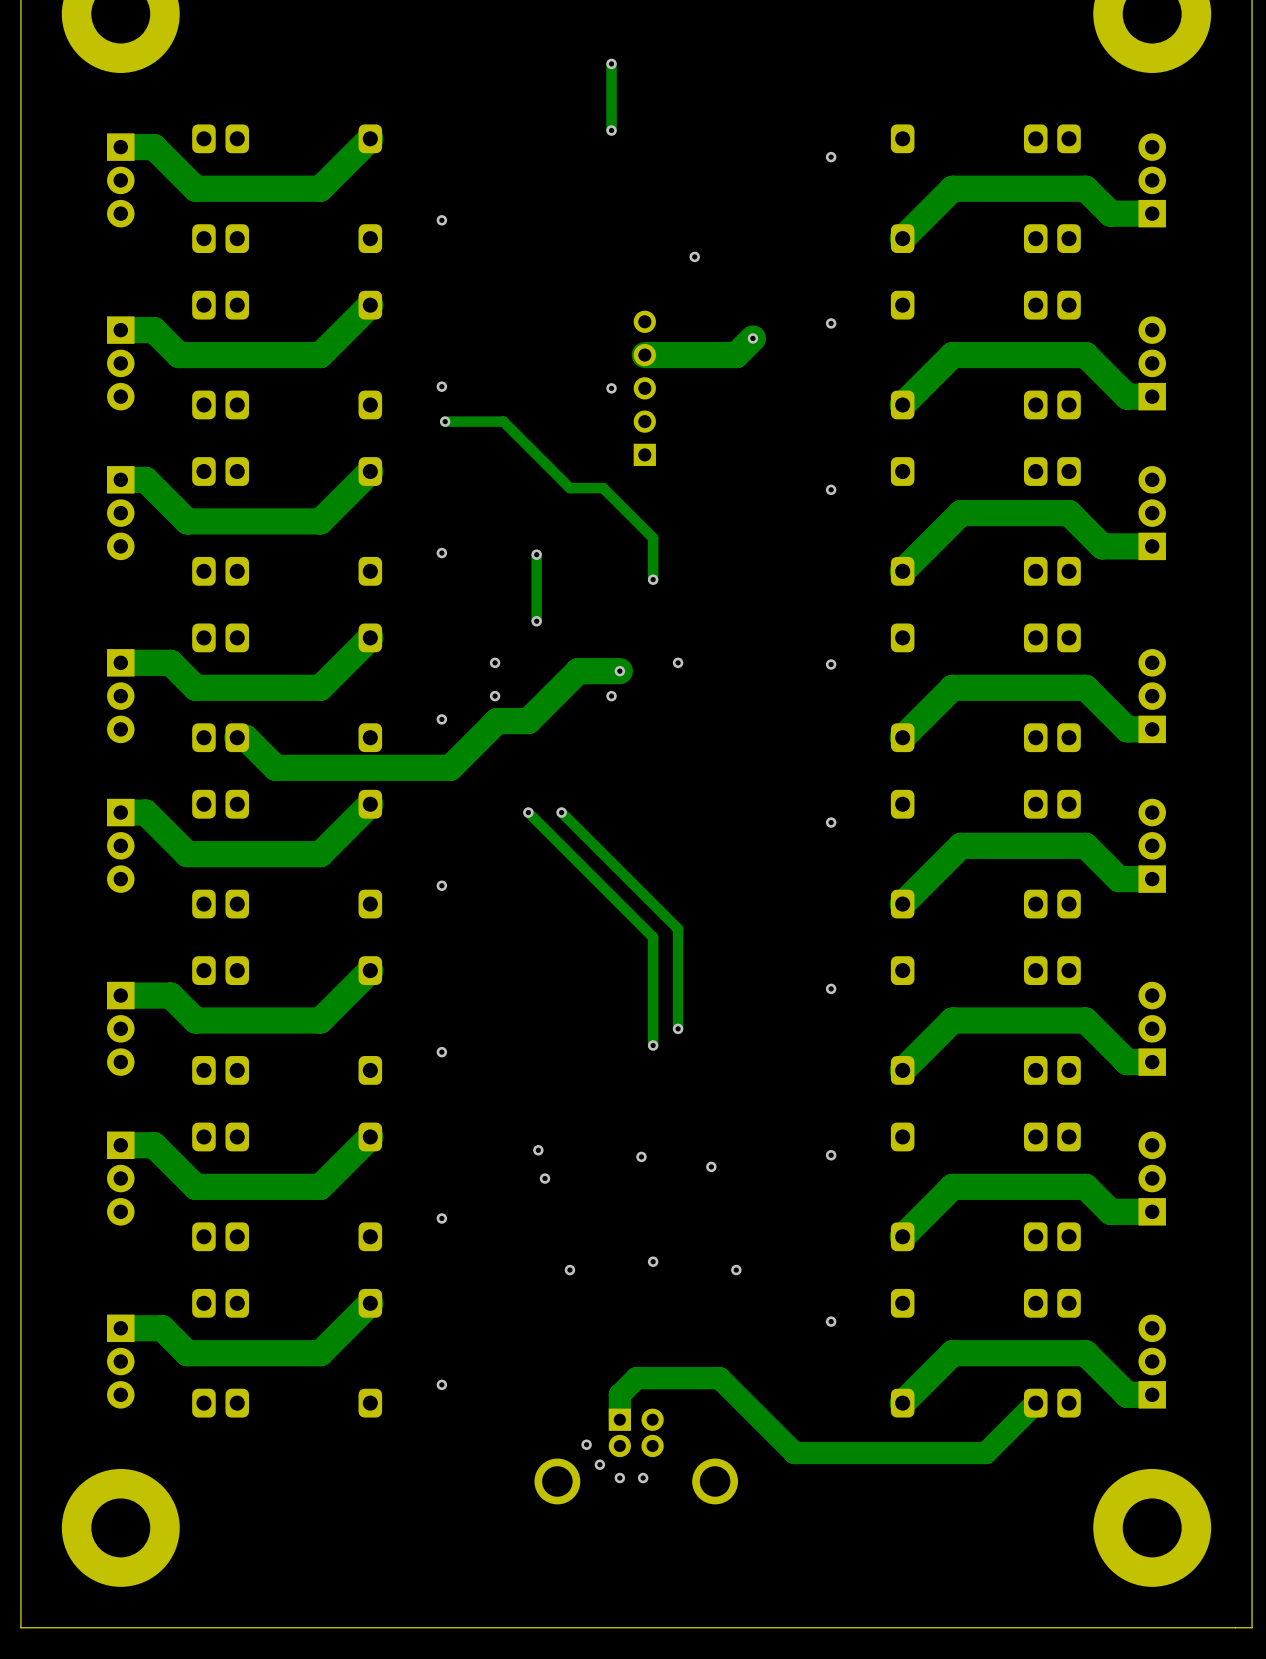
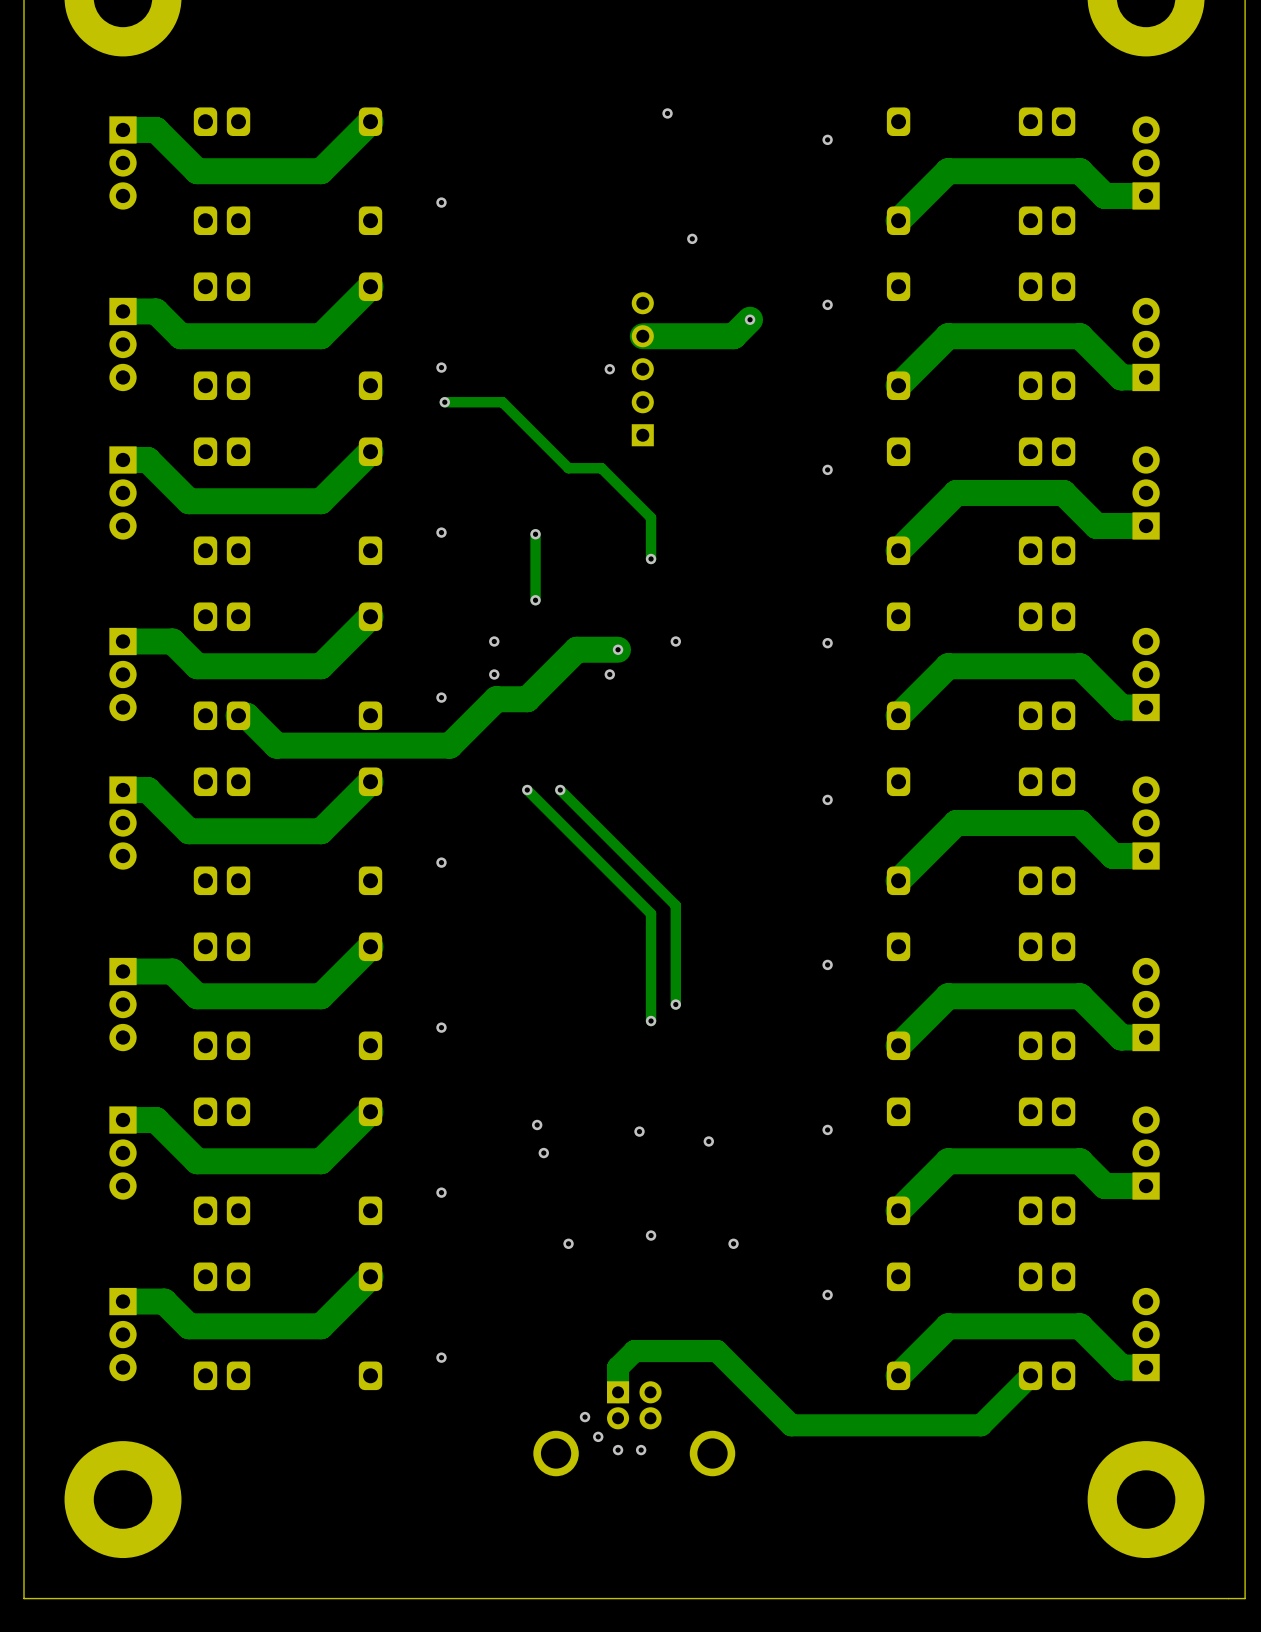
track: (611, 63) (611, 130) -> none
via: (611, 63) -> none
via: (611, 130) -> none
via: none -> (667, 113)

